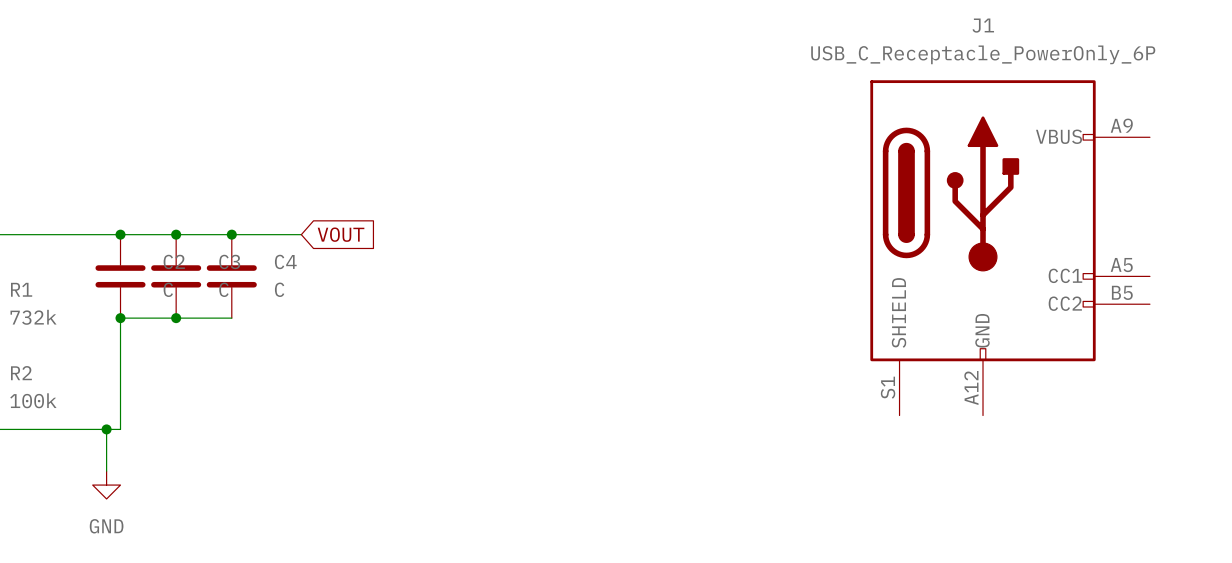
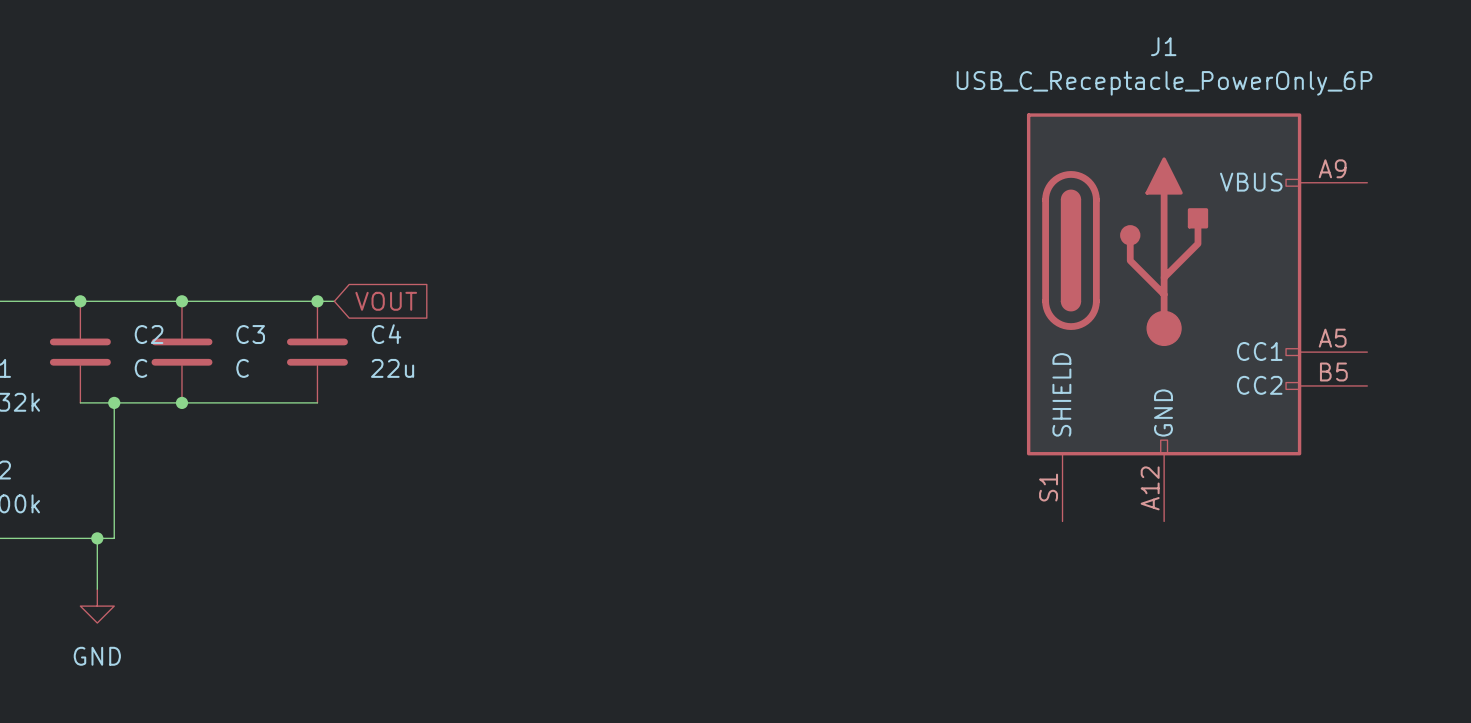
junction position: (120, 234) -> (80, 301)
junction position: (231, 234) -> (317, 301)
C2 position: (120, 276) -> (80, 352)
C4 position: (231, 276) -> (317, 352)
C4 value: C (279, 289) -> 22u (392, 368)
wire: none -> (80, 402) (114, 402)
wire: none -> (249, 402) (317, 402)

